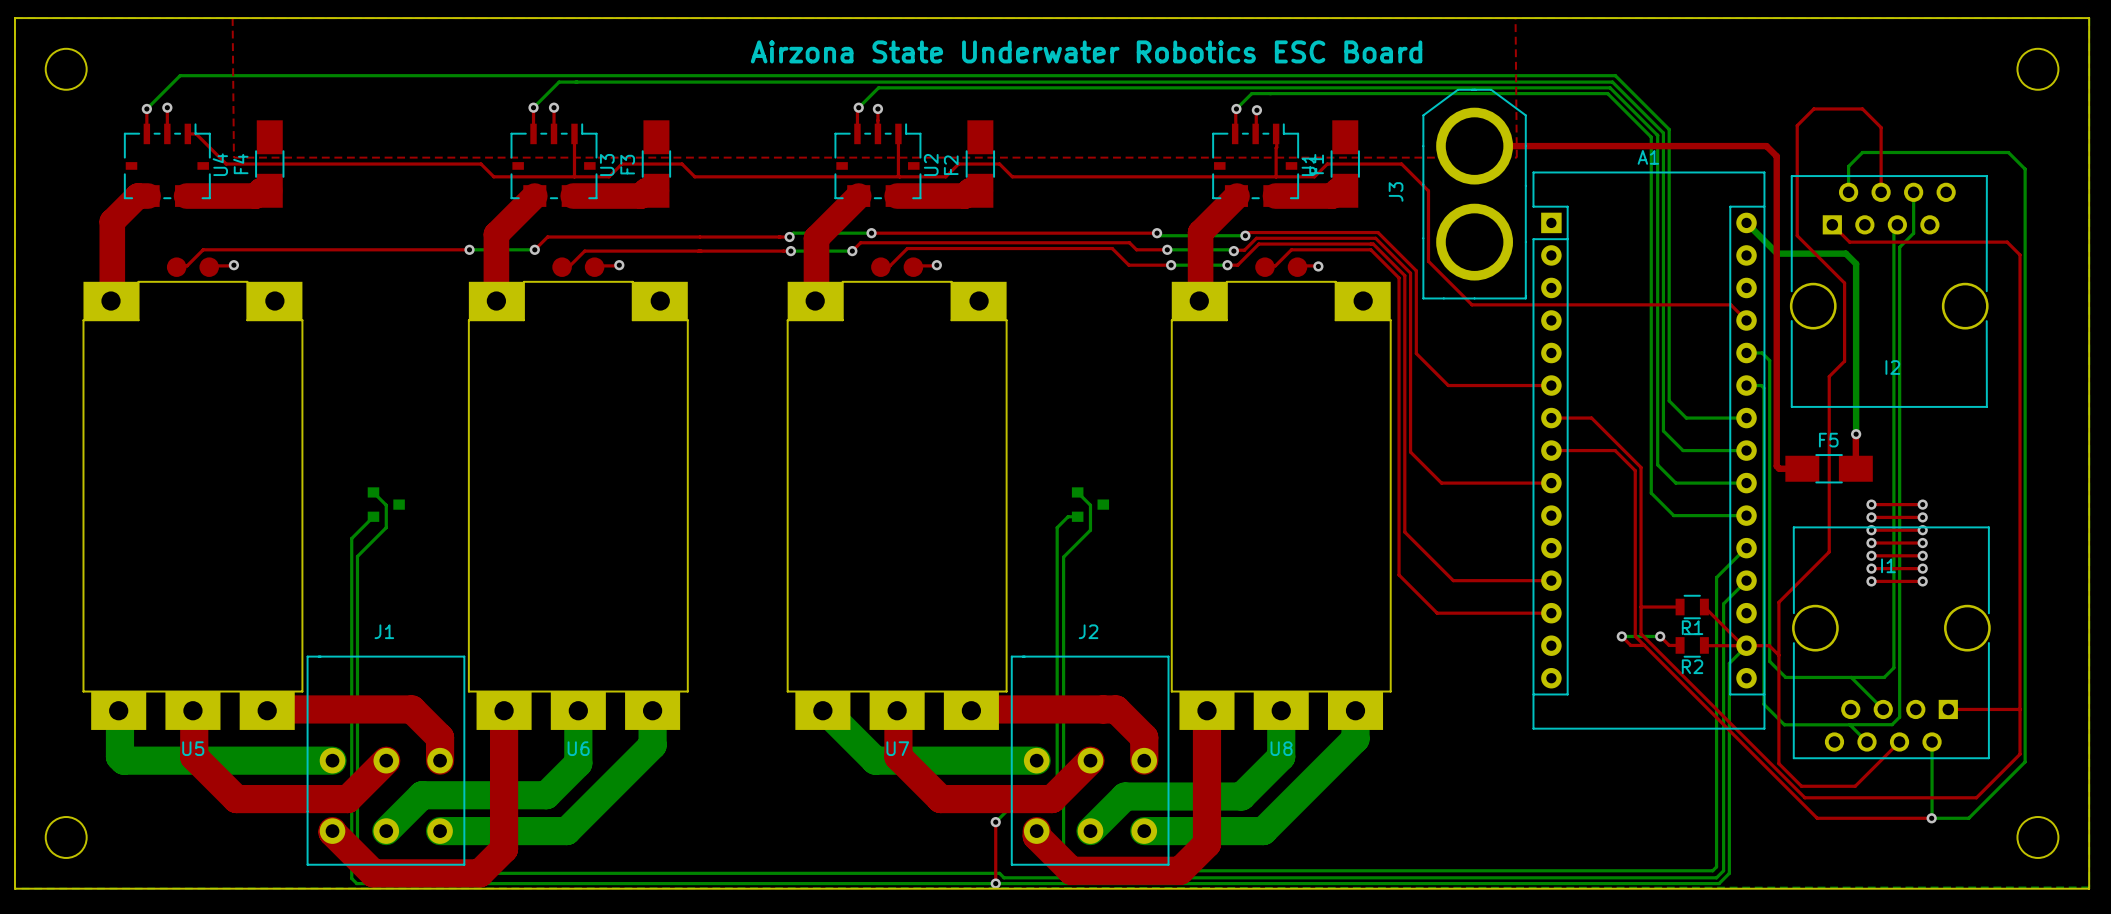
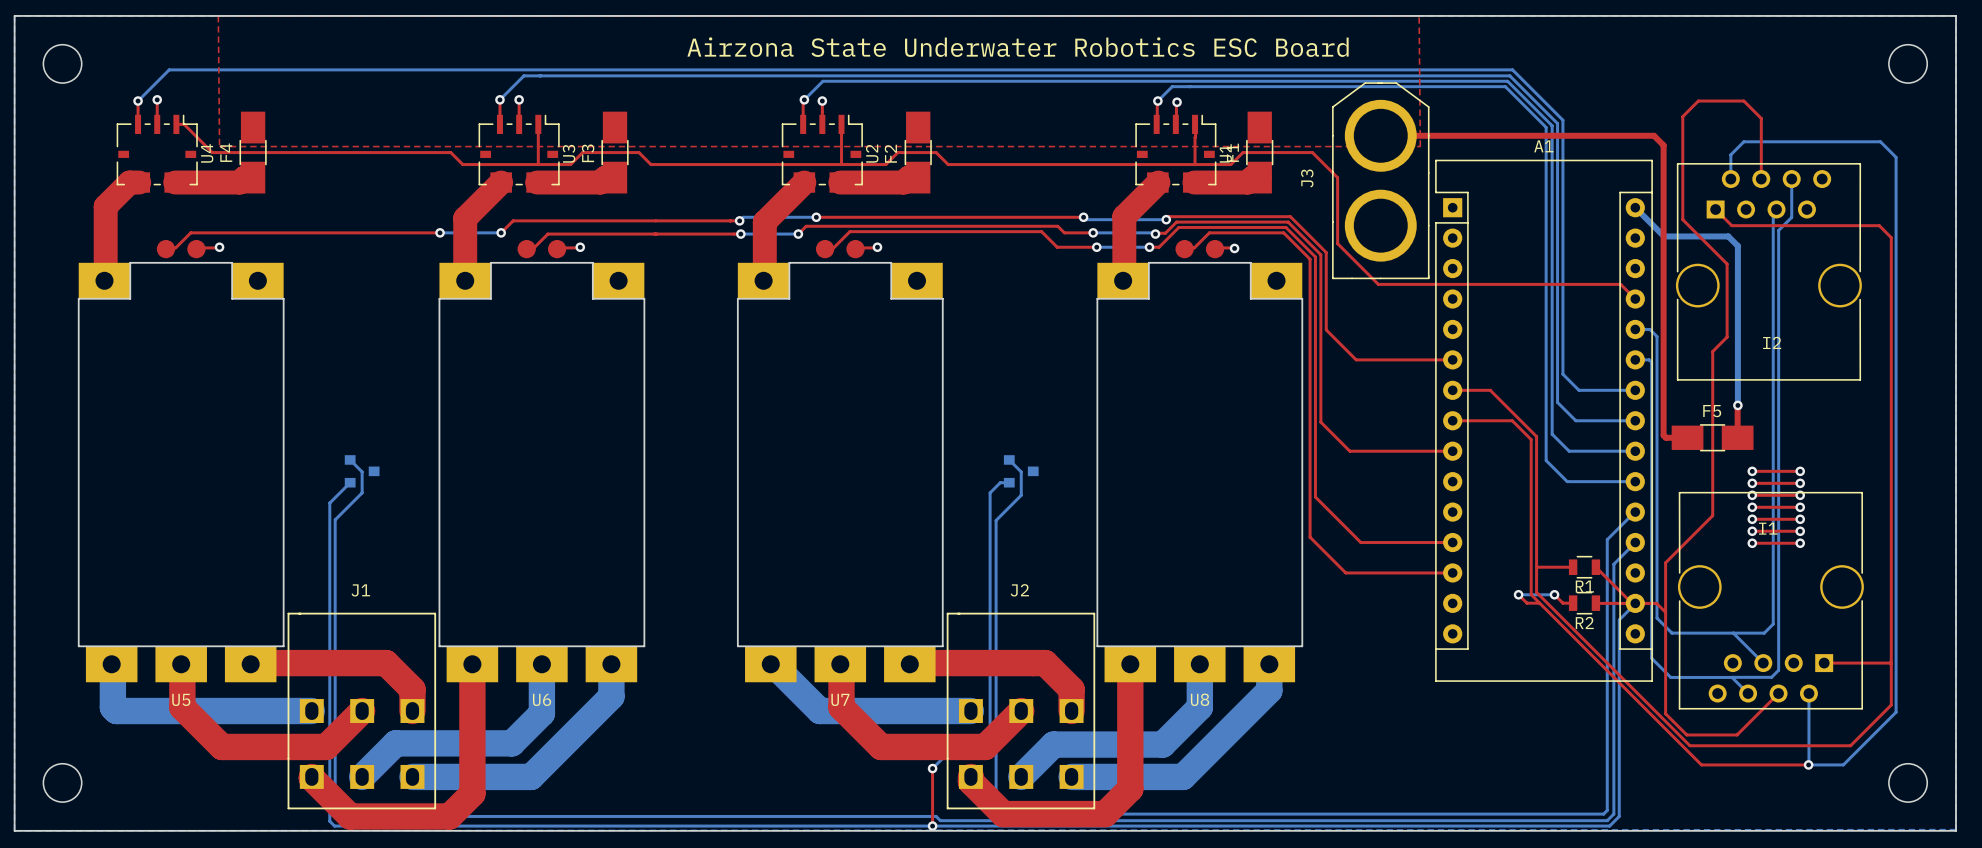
J1 footprint: [306, 655, 466, 866] -> [287, 612, 437, 810]
J2 footprint: [1010, 655, 1170, 866] -> [946, 612, 1096, 810]

